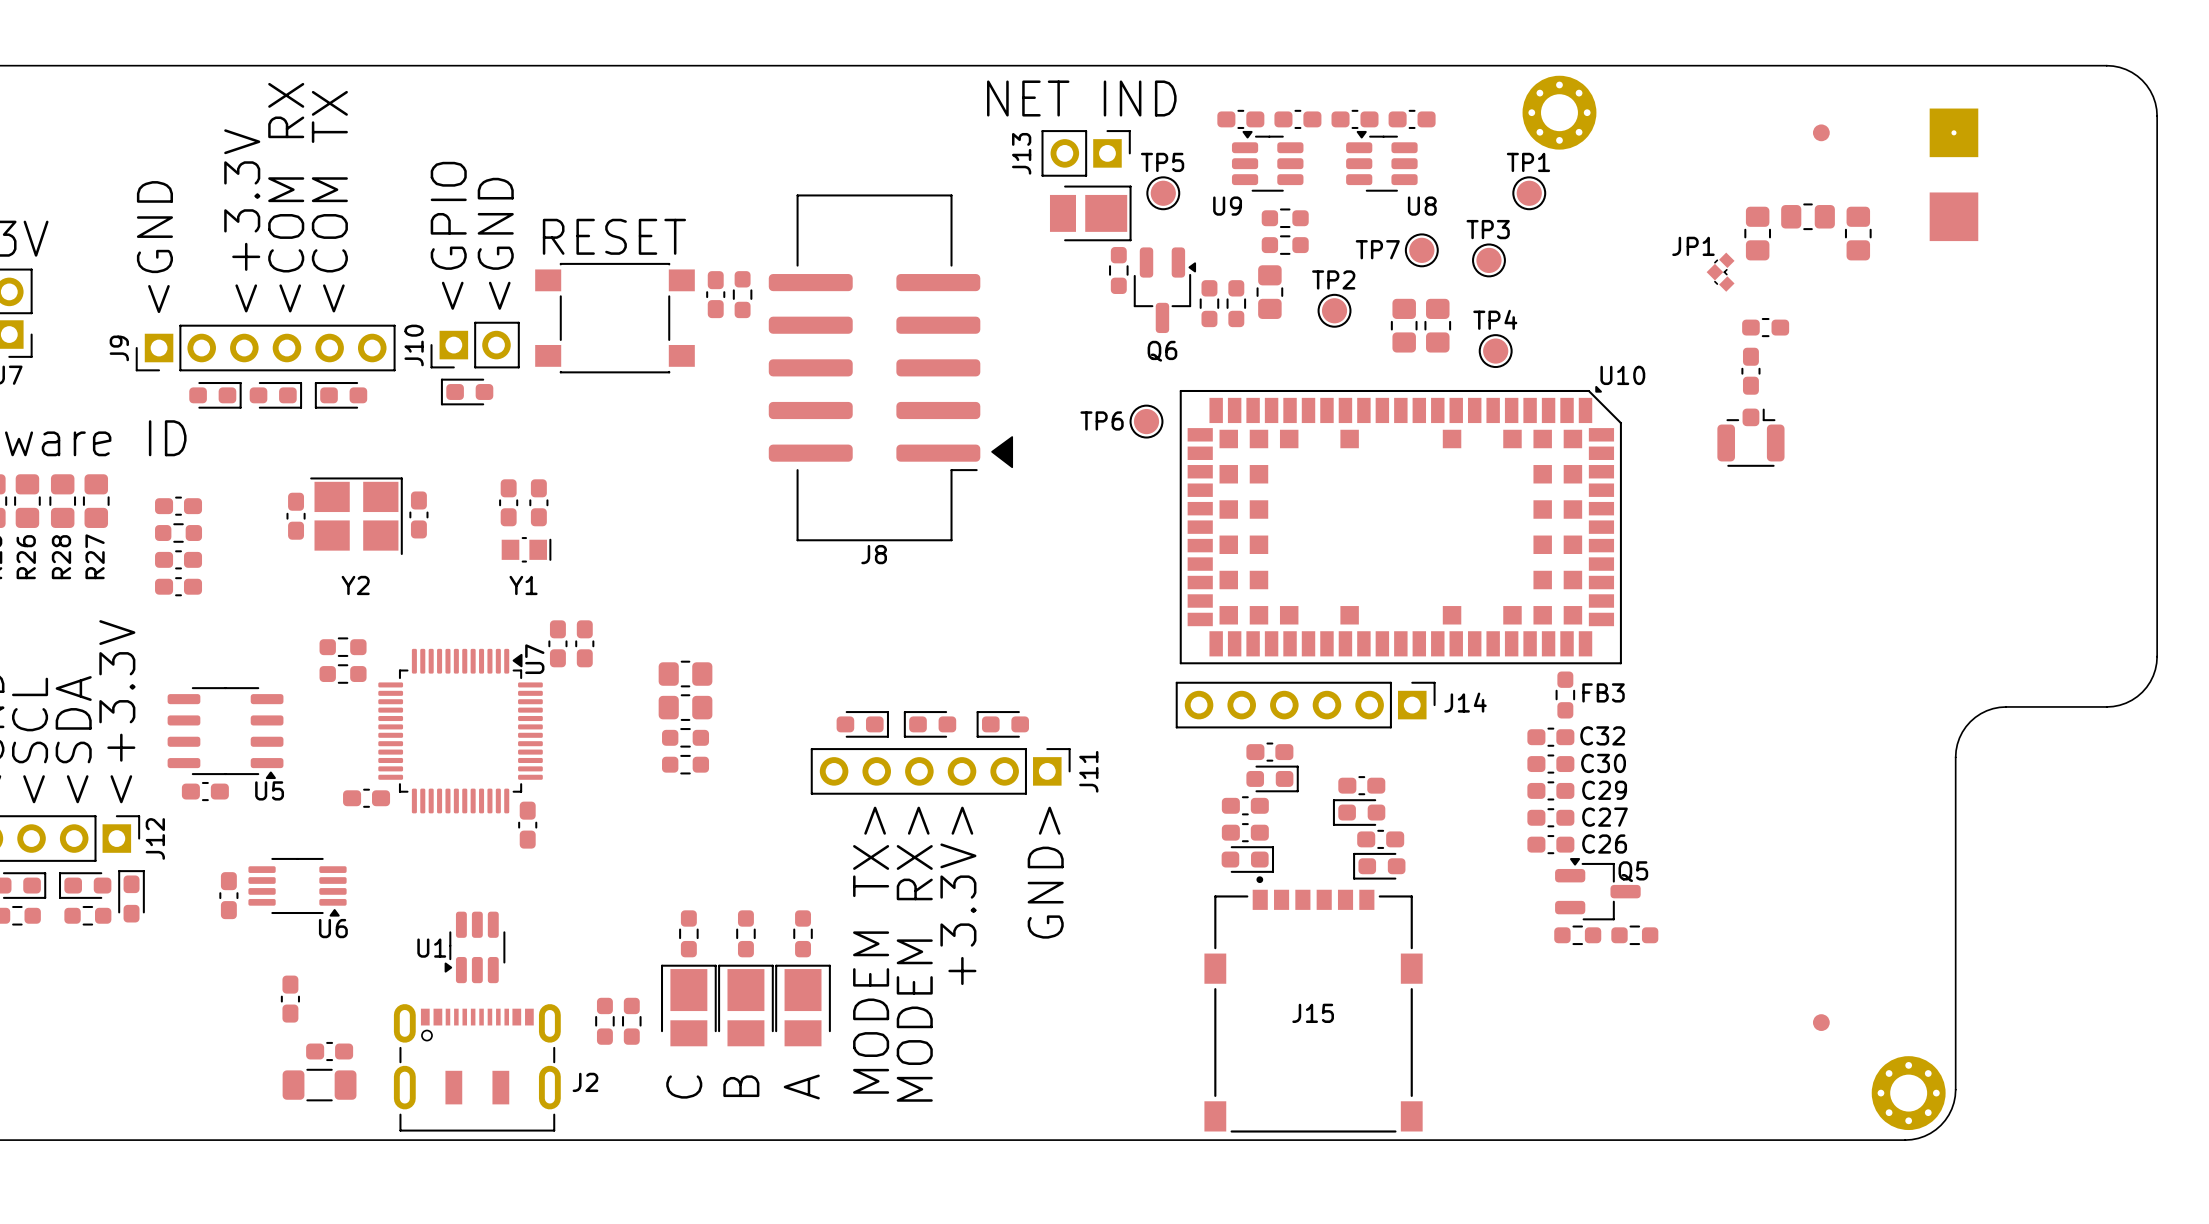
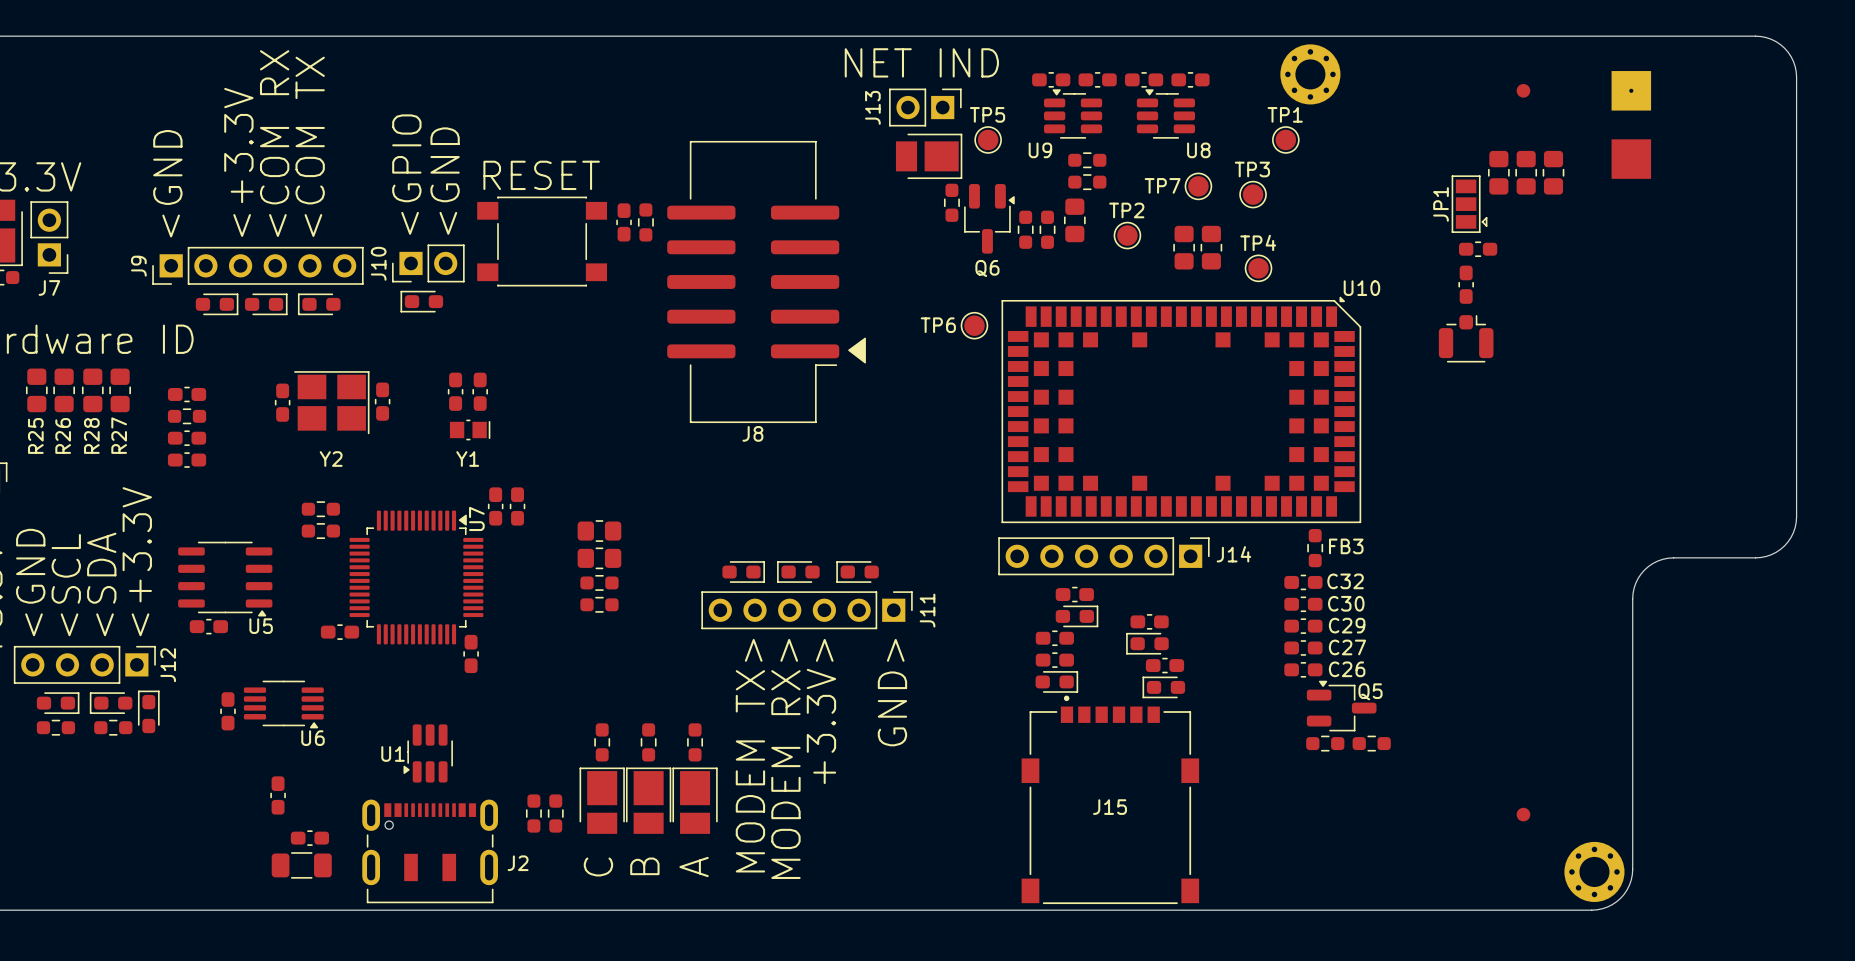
part: (1808, 216) -> none
part: (1757, 233) -> none
part: none -> (1498, 172)
part: none -> (1526, 172)
JP1 footprint: [1706, 252, 1735, 292] -> [1451, 175, 1488, 233]

